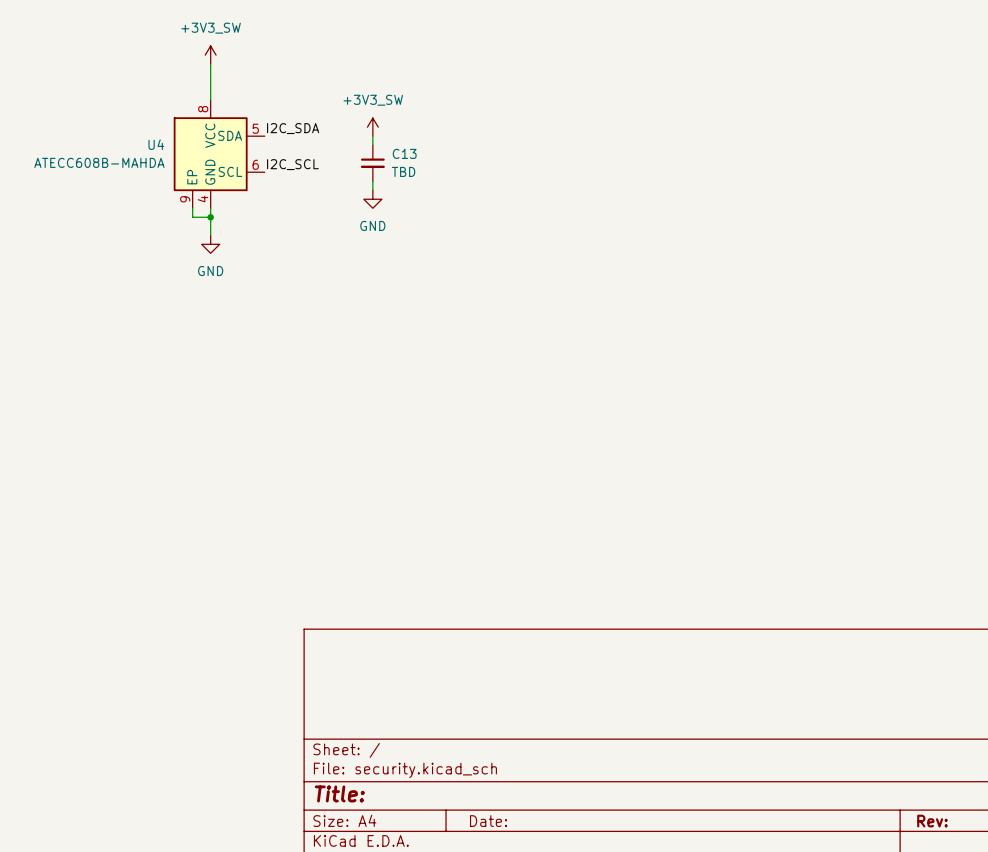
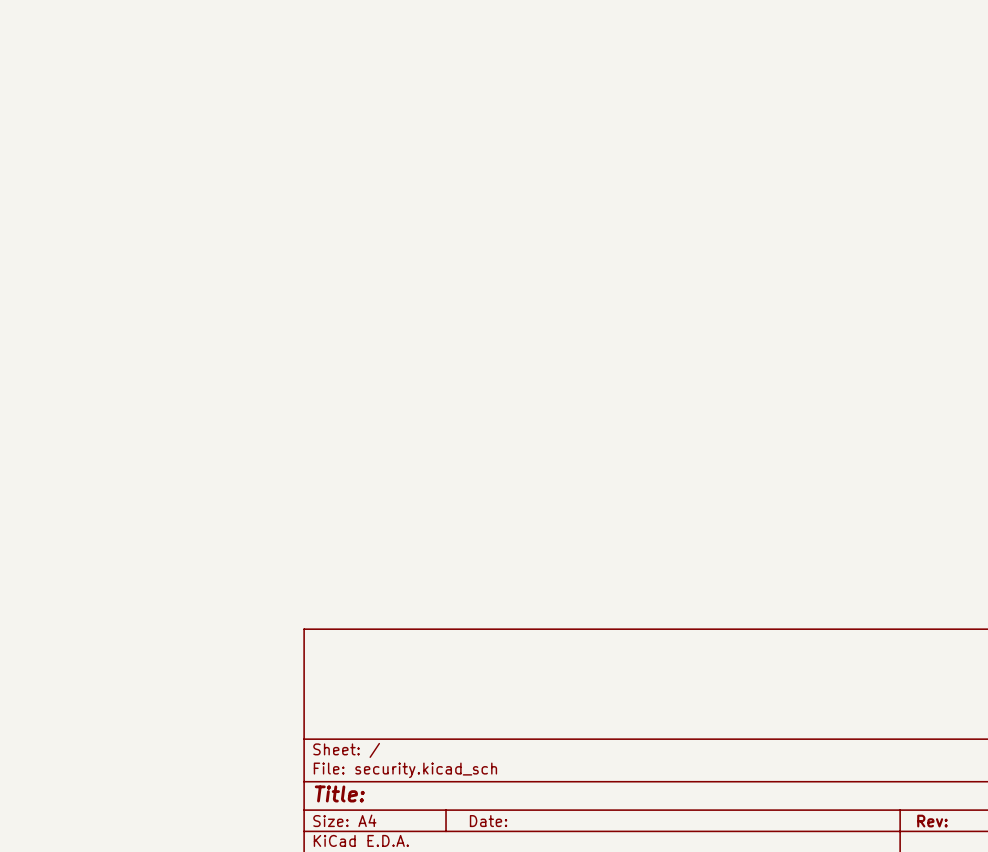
power symbol: +3V3_SW (210, 55) -> none
wire: (210, 64) (210, 100) -> none
power symbol: +3V3_SW (372, 127) -> none
label: I2C_SDA (293, 128) -> none
wire: (372, 136) (372, 145) -> none
U4: ATECC608B-MAHDA (219, 154) -> none
C13: TBD (372, 163) -> none
label: I2C_SCL (292, 164) -> none
wire: (372, 181) (372, 190) -> none
power symbol: GND (372, 199) -> none
wire: (192, 208) (192, 217) (210, 217) -> none
wire: (210, 208) (210, 235) -> none
junction: (210, 217) -> none
power symbol: GND (210, 244) -> none

